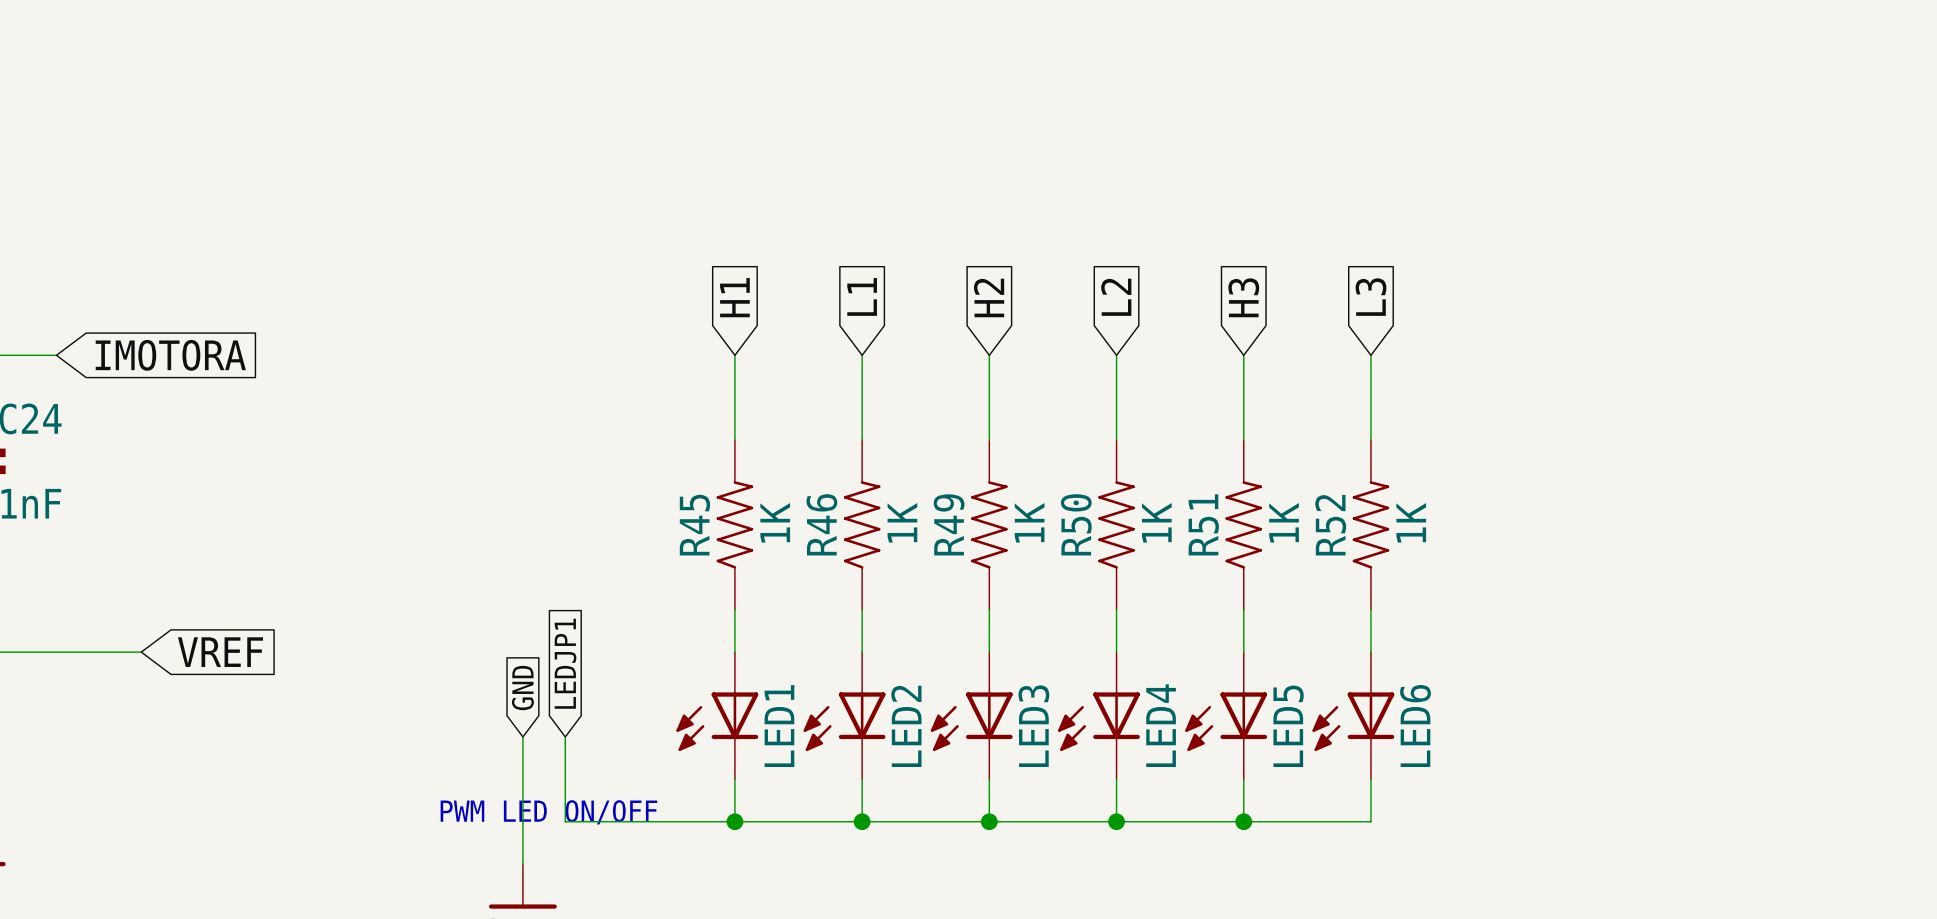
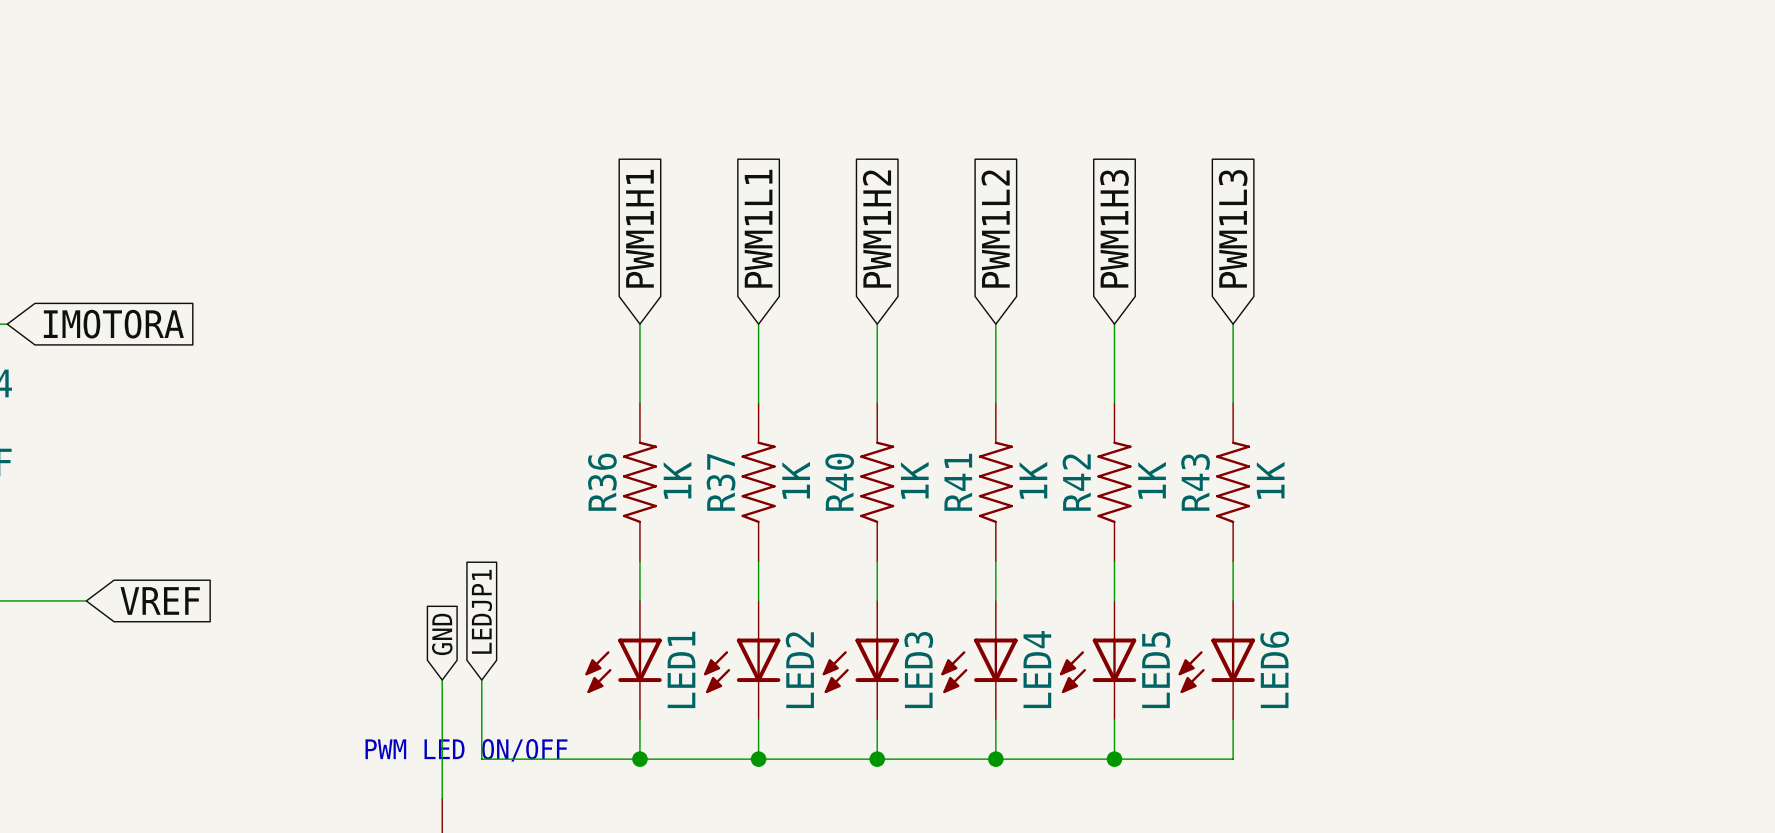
global label: L1 (862, 296) -> PWM1L1 (758, 228)
global label: H1 (734, 297) -> PWM1H1 (639, 228)
global label: H2 (989, 297) -> PWM1H2 (876, 229)
global label: L2 (1116, 297) -> PWM1L2 (995, 229)
global label: H3 (1243, 297) -> PWM1H3 (1114, 228)
global label: L3 (1370, 297) -> PWM1L3 (1233, 228)
R46 name: R46 (821, 524) -> R37 (721, 482)
R49 name: R49 (949, 524) -> R40 (839, 482)
R50 name: R50 (1076, 524) -> R41 (958, 482)
R51 name: R51 (1203, 524) -> R42 (1076, 482)
R45 name: R45 (694, 525) -> R36 (602, 482)
R52 name: R52 (1330, 525) -> R43 (1195, 482)

